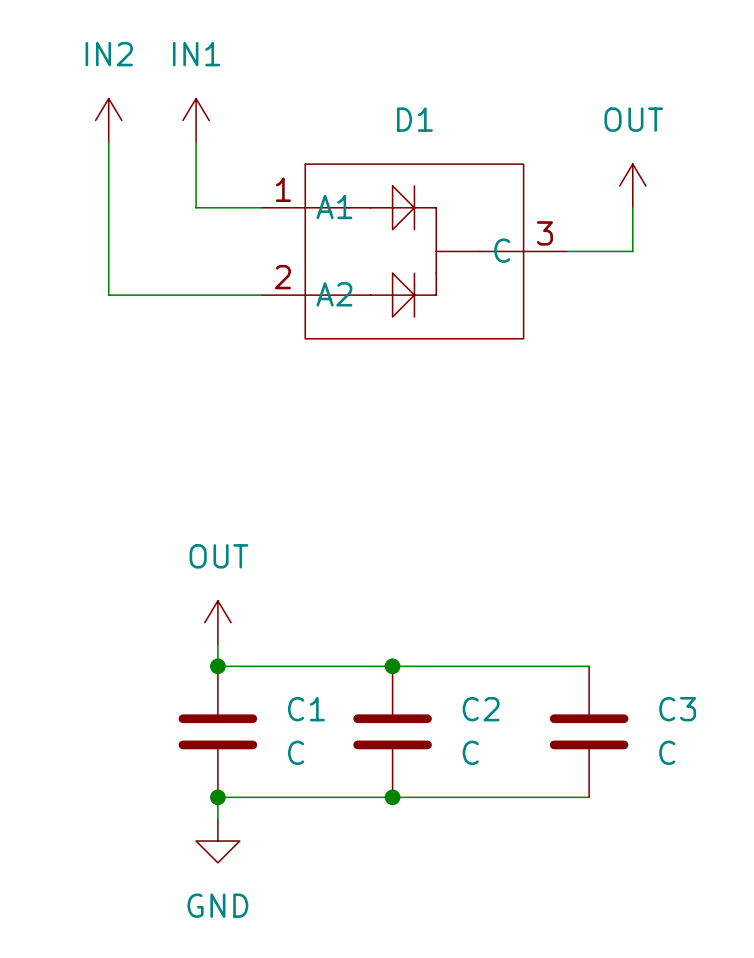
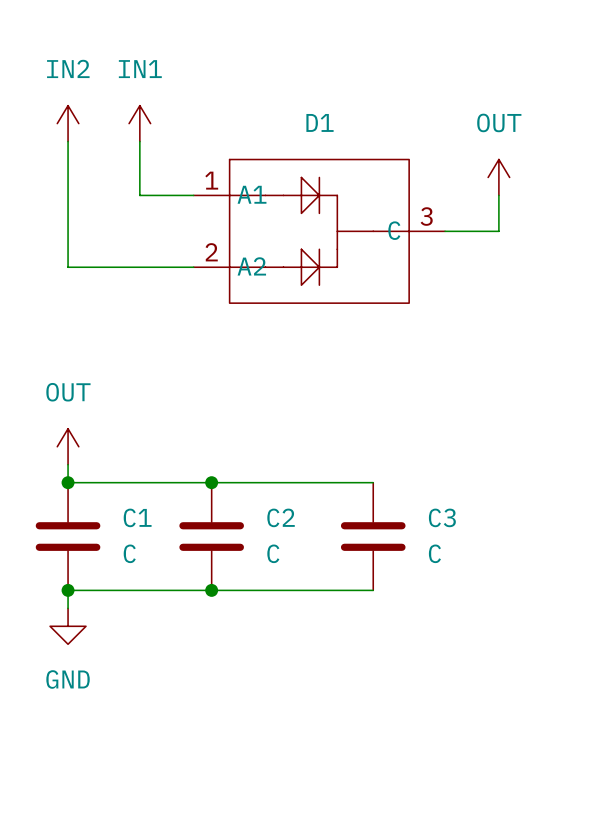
junction: none -> (68, 482)
junction: none -> (211, 482)
power symbol position: OUT (217, 622) -> OUT (68, 446)
wire: (217, 644) (217, 666) (589, 666) -> (68, 464) (68, 482) (373, 482)
junction: (217, 666) -> none
junction: (392, 666) -> none
junction: none -> (68, 590)
junction: none -> (211, 590)
C1 position: (217, 731) -> (68, 536)
C2 position: (392, 731) -> (211, 536)
C3 position: (589, 731) -> (373, 536)
junction: (217, 797) -> none
junction: (392, 797) -> none
wire: (589, 797) (217, 797) (217, 819) -> (373, 590) (68, 590) (68, 608)
power symbol position: GND (217, 841) -> GND (68, 626)

